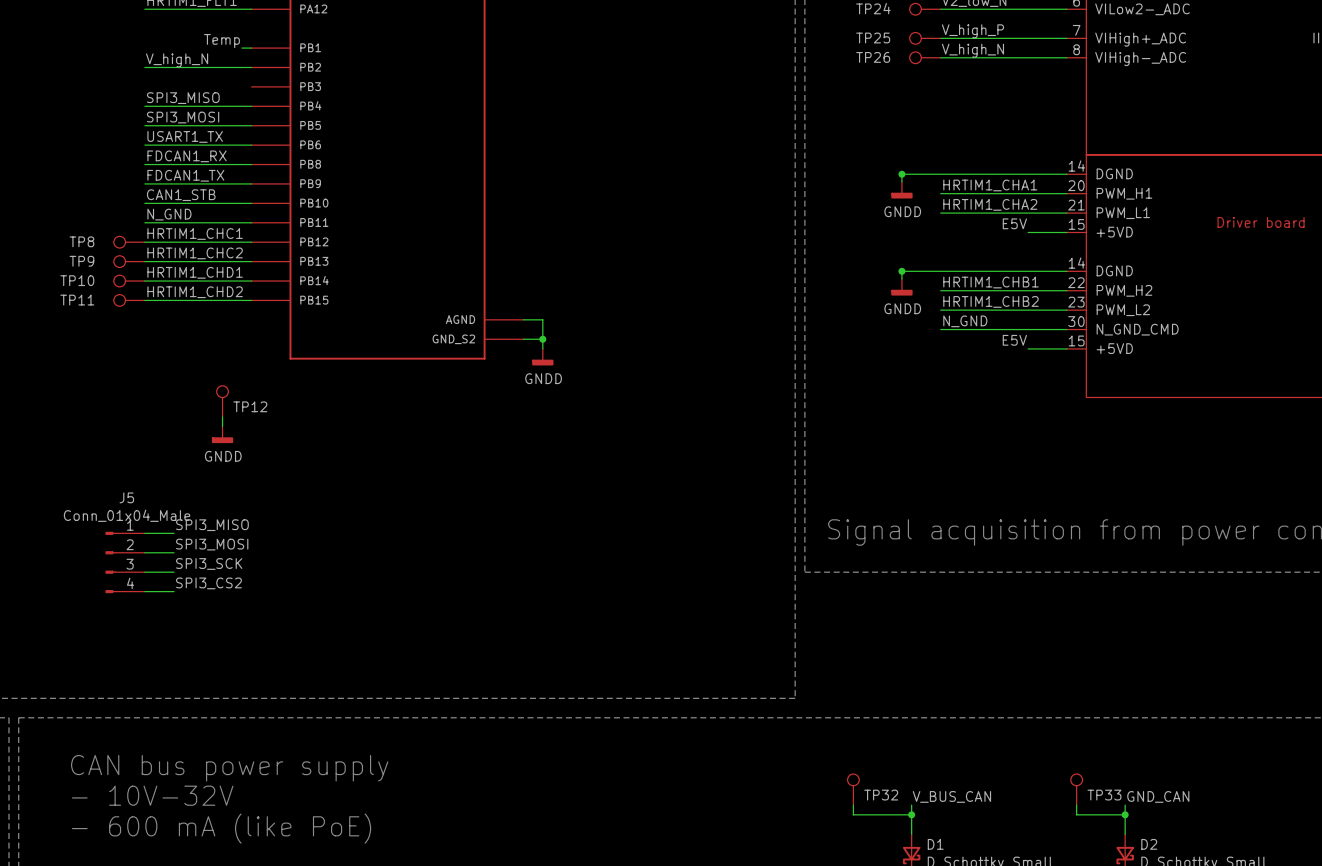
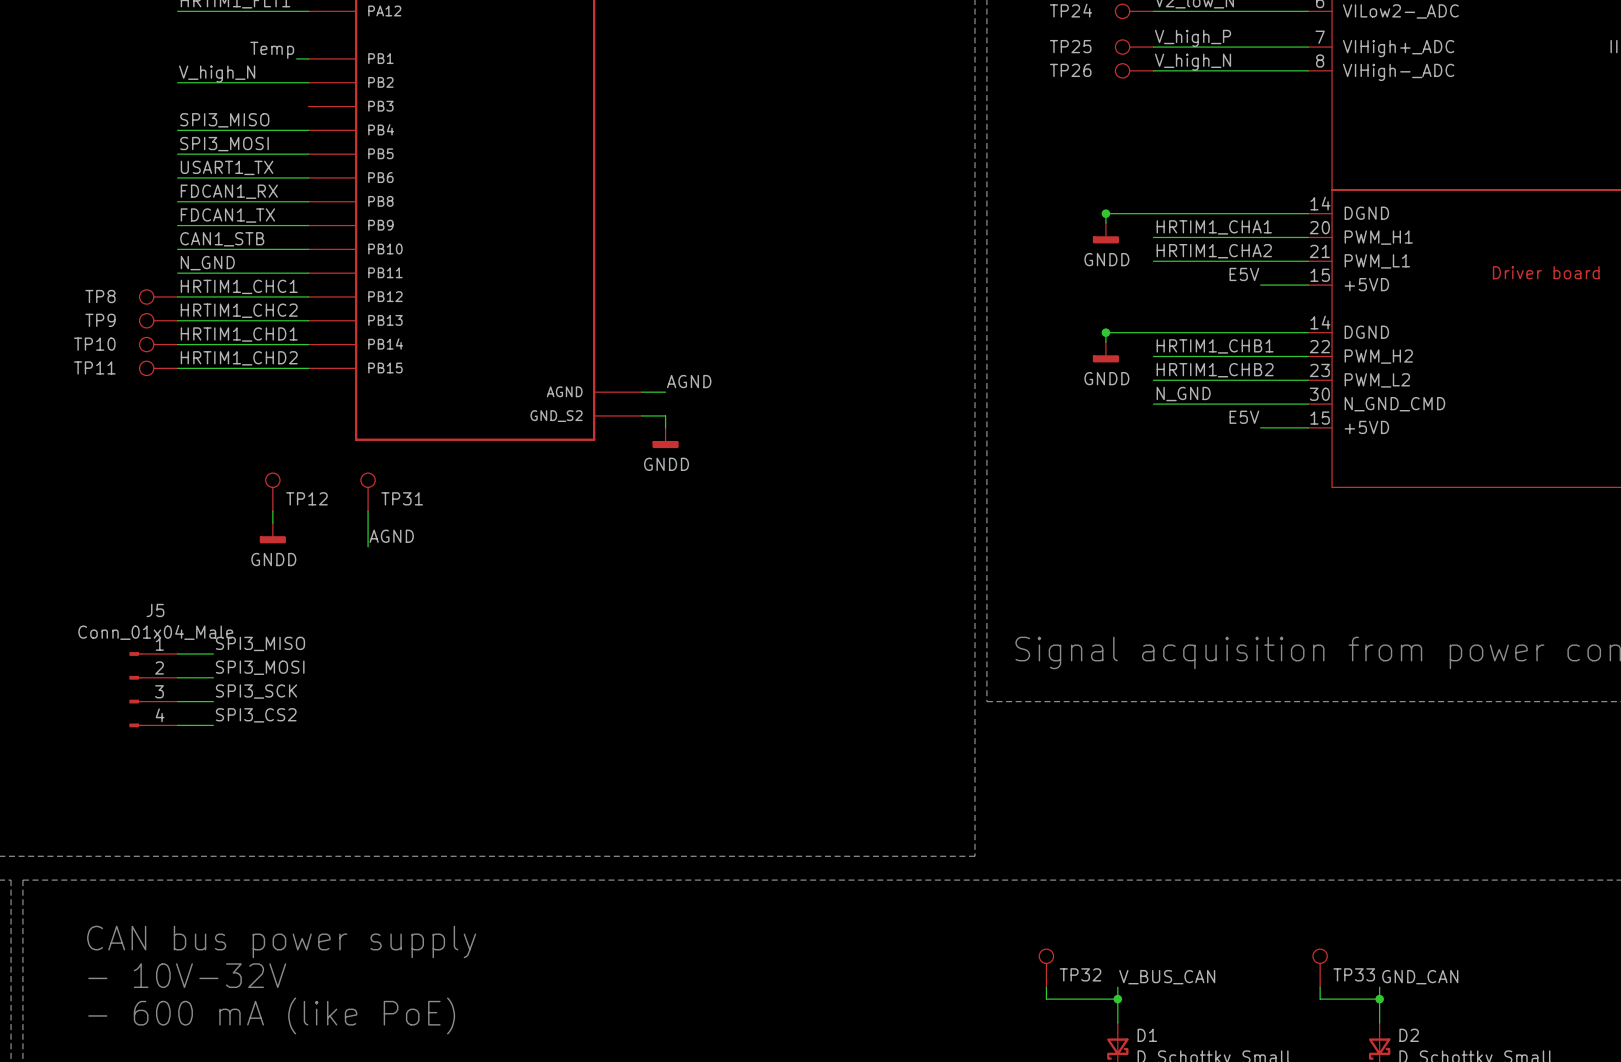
label: none -> AGND (689, 381)
wire: (542, 319) (542, 339) -> none
junction: (542, 339) -> none
TP31: none -> (368, 492)
wire: none -> (368, 511) (368, 546)
label: none -> AGND (391, 536)

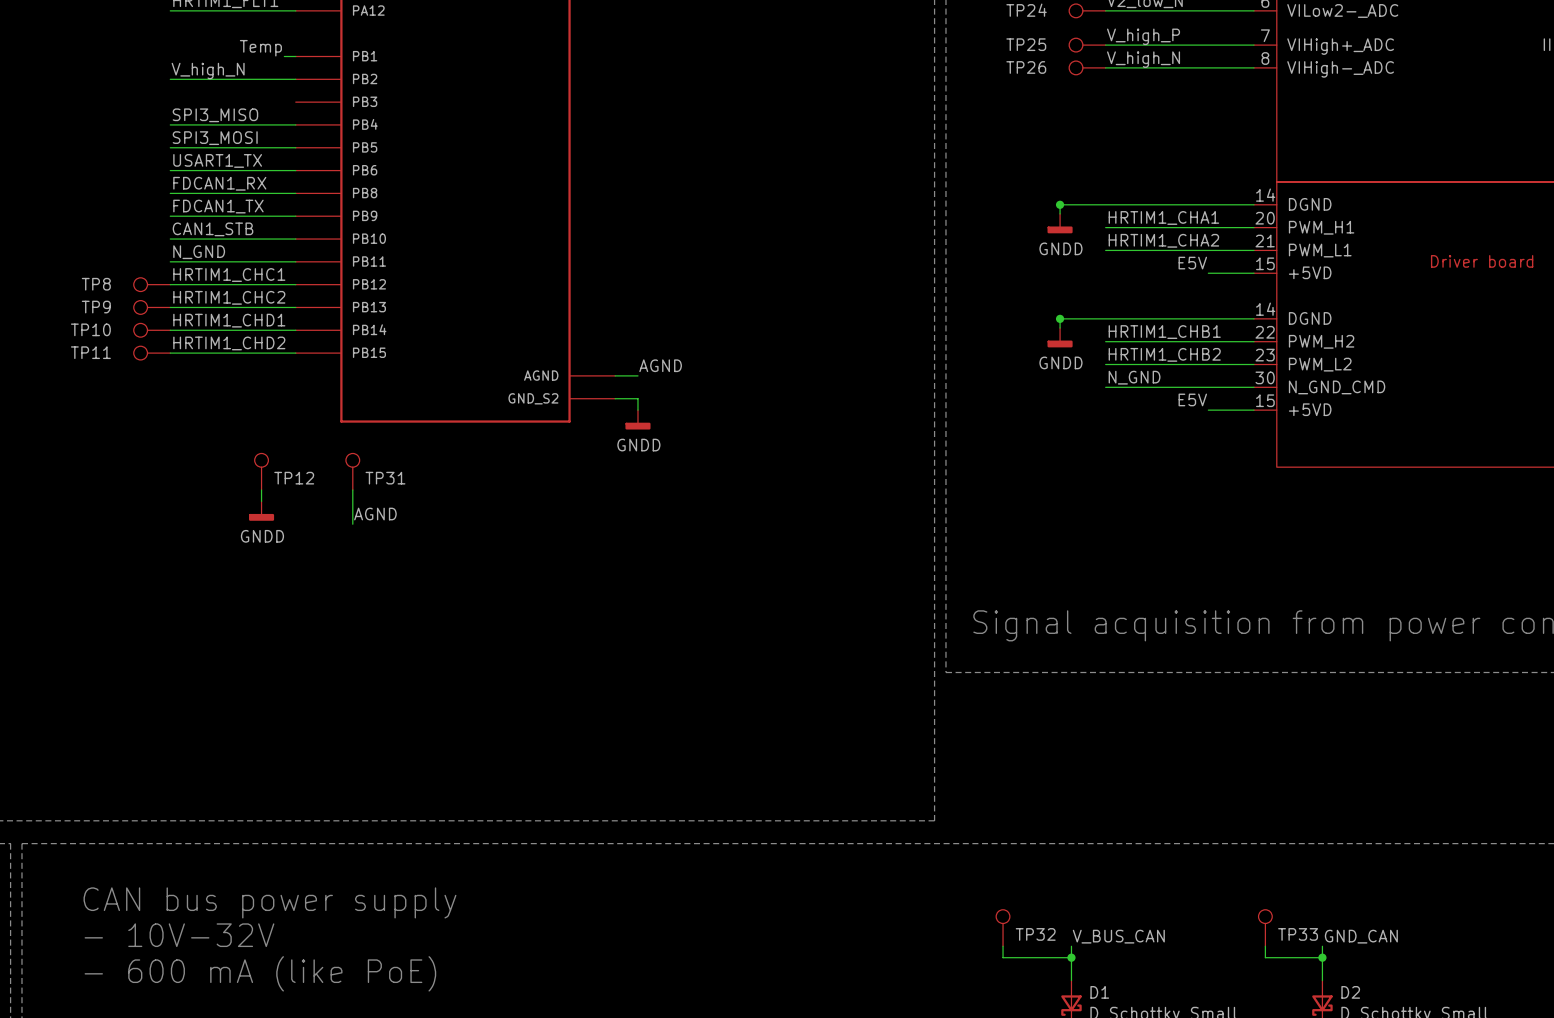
label: SPI3_MISO (260, 643) -> none
wire: (177, 653) (213, 653) -> none
label: SPI3_MOSI (260, 667) -> none
wire: (177, 677) (213, 677) -> none
J5: Conn_01x04_Male (153, 689) -> none
label: SPI3_SCK (256, 691) -> none
wire: (177, 701) (213, 701) -> none
label: SPI3_CS2 (256, 715) -> none
wire: (177, 725) (213, 725) -> none

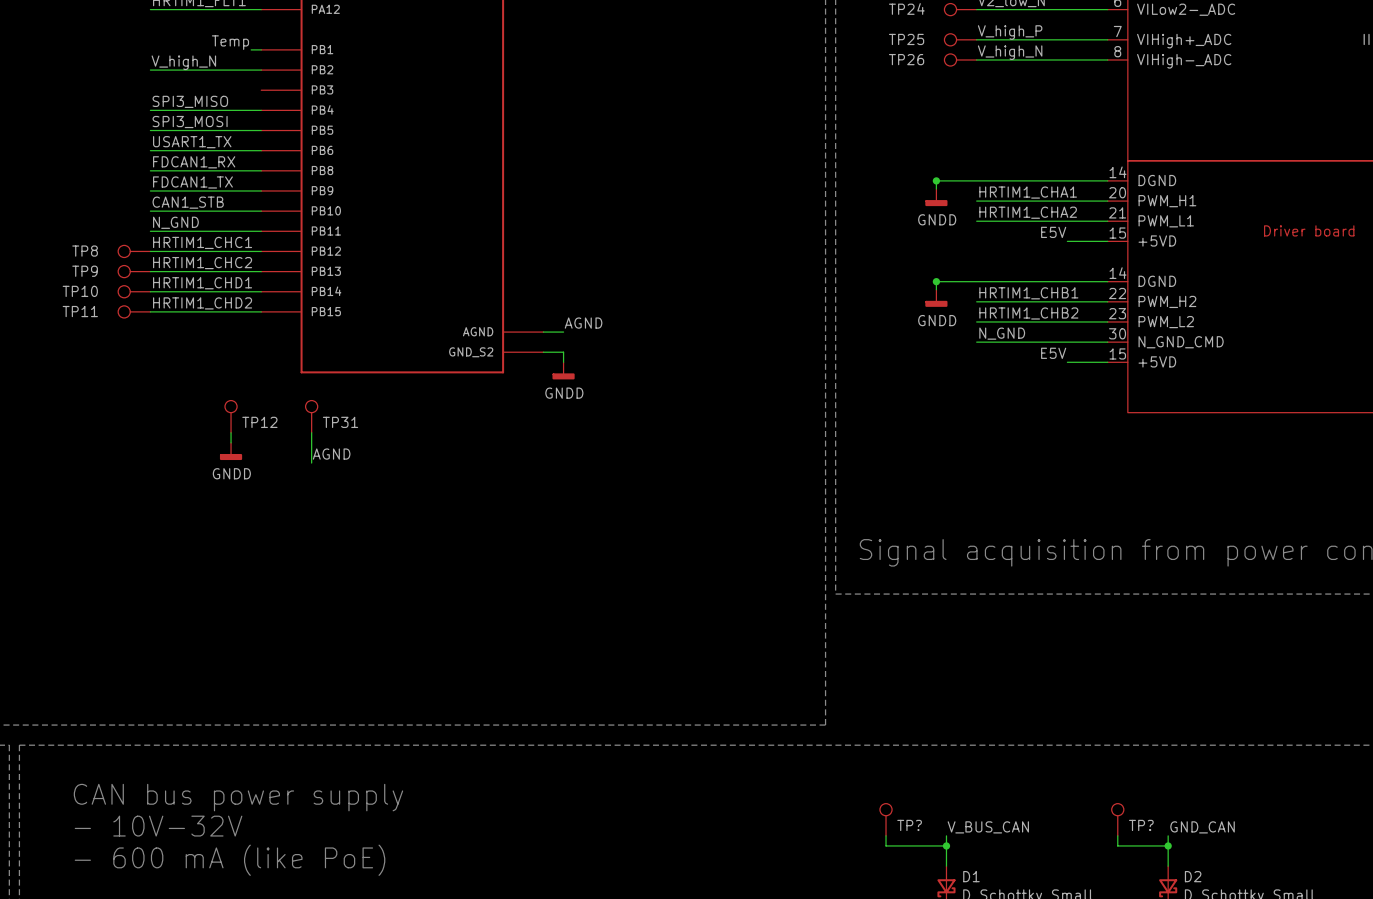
TP32 name: TP32 (1035, 934) -> TP? (909, 825)
TP33 name: TP33 (1298, 934) -> TP? (1141, 825)

